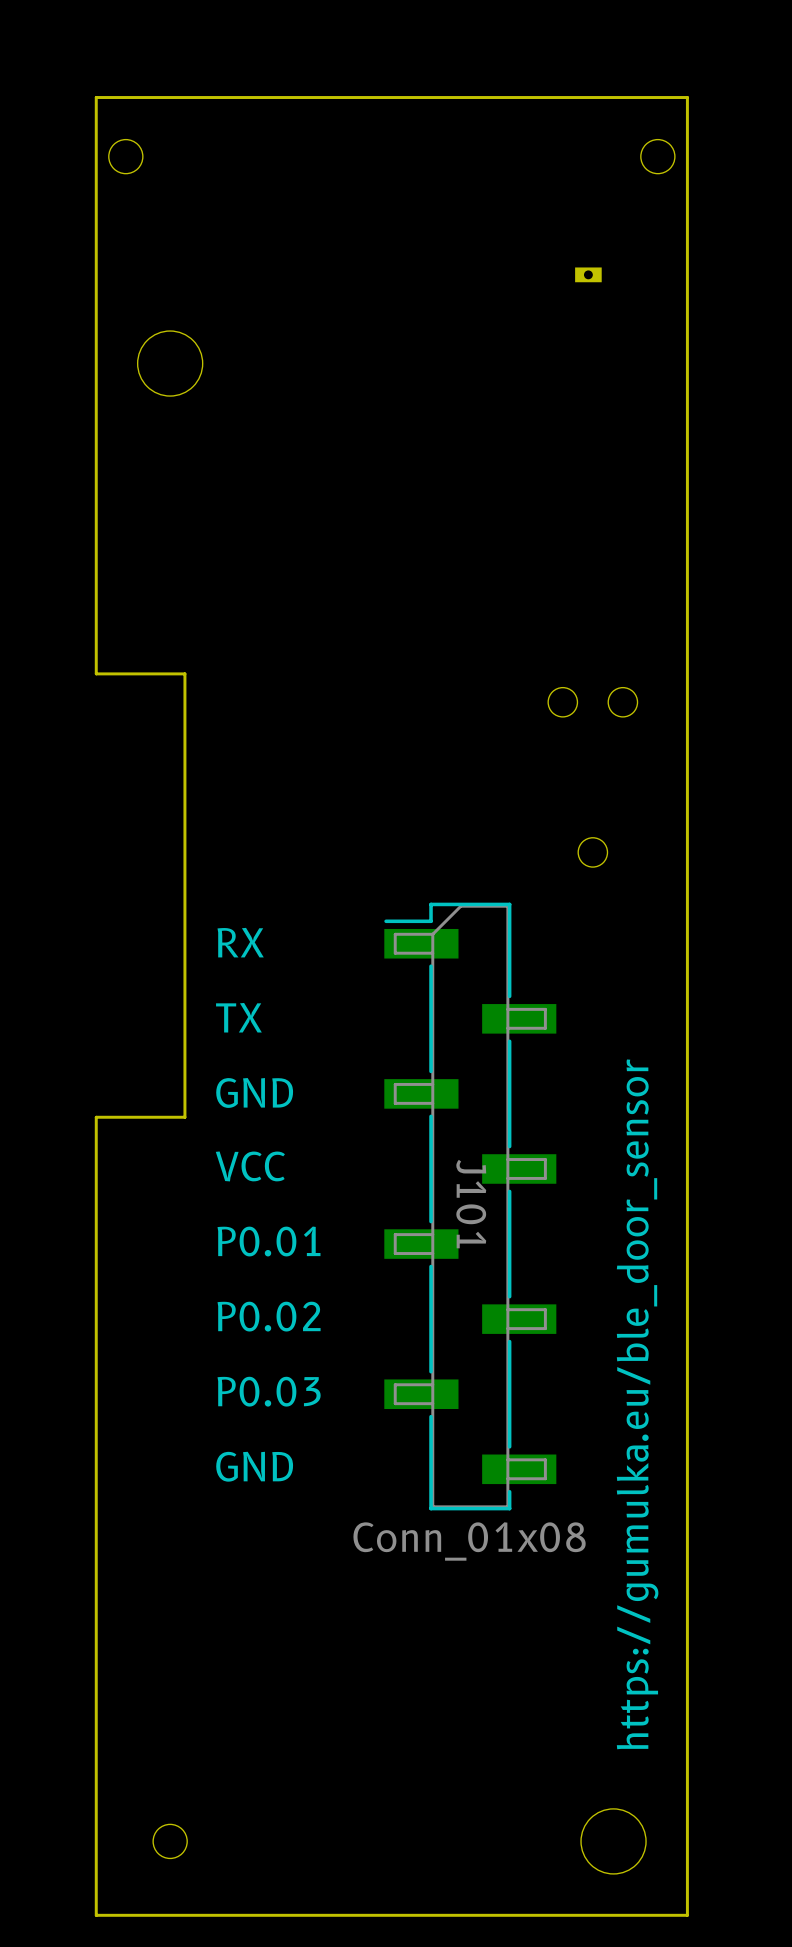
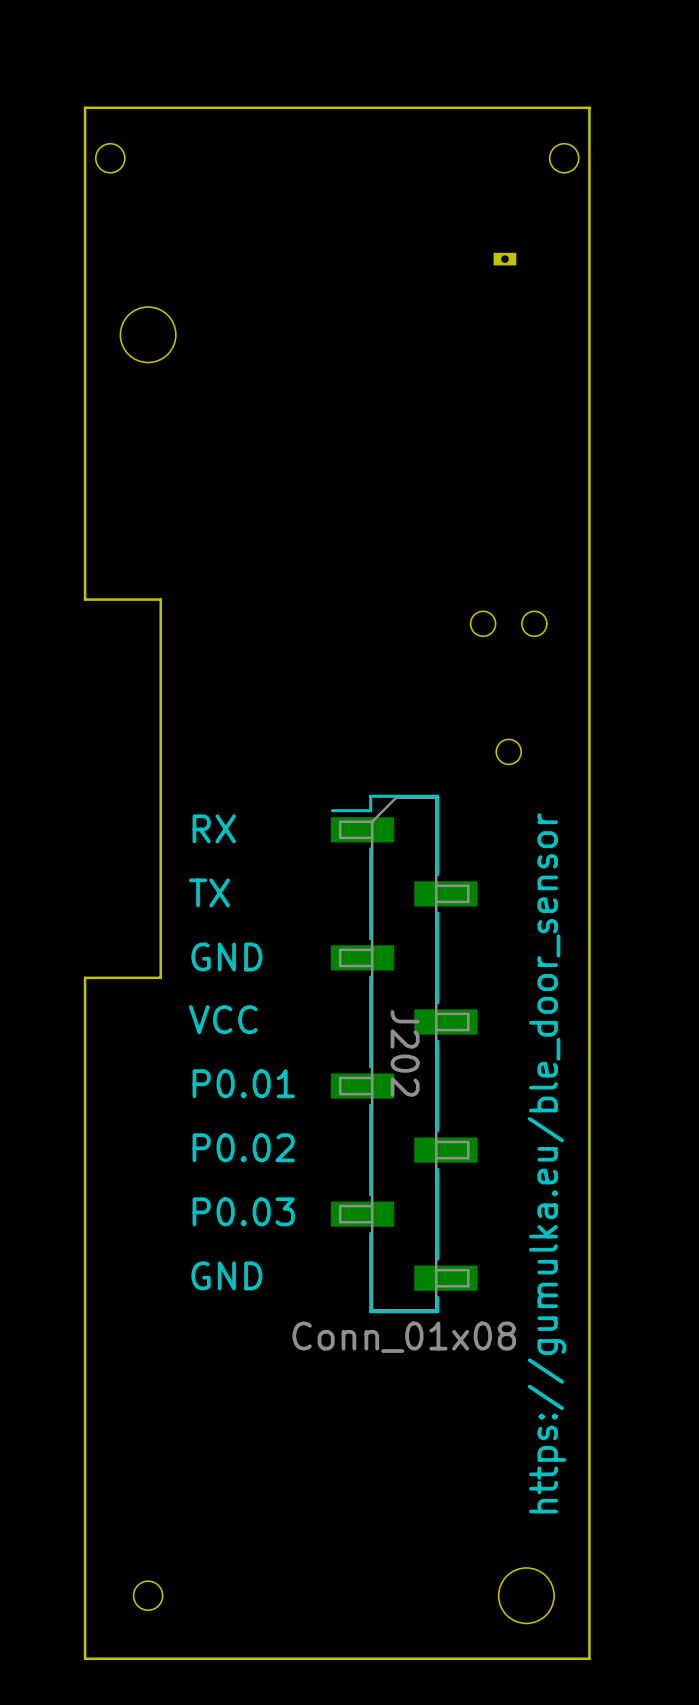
J101 name: J101 (471, 1204) -> J202 (405, 1053)

